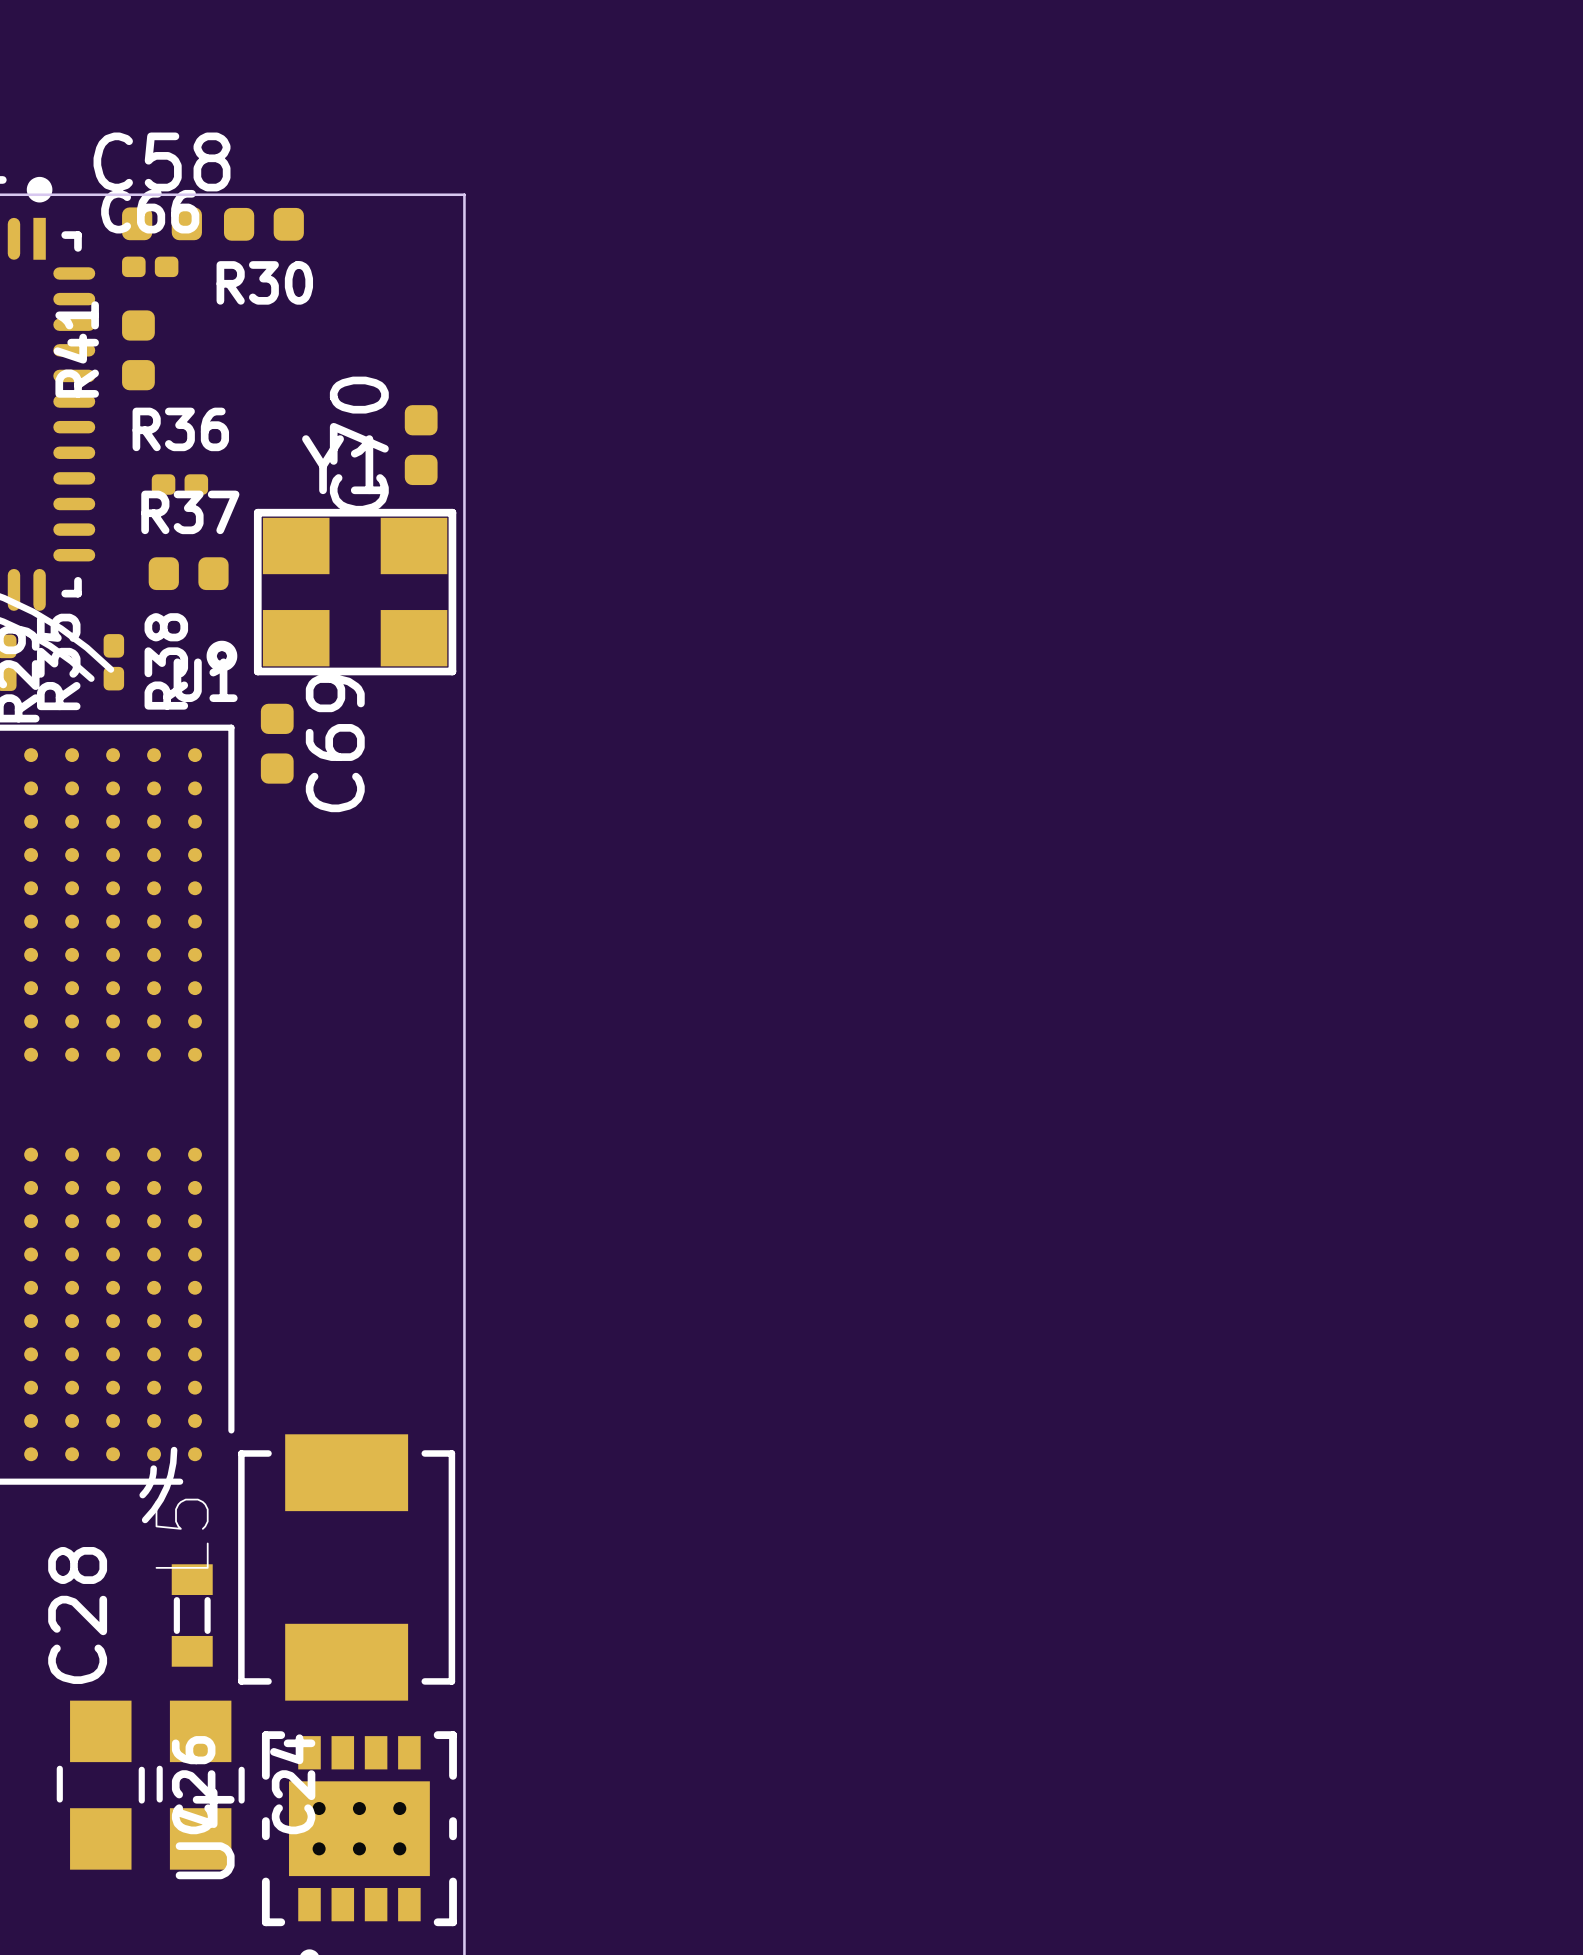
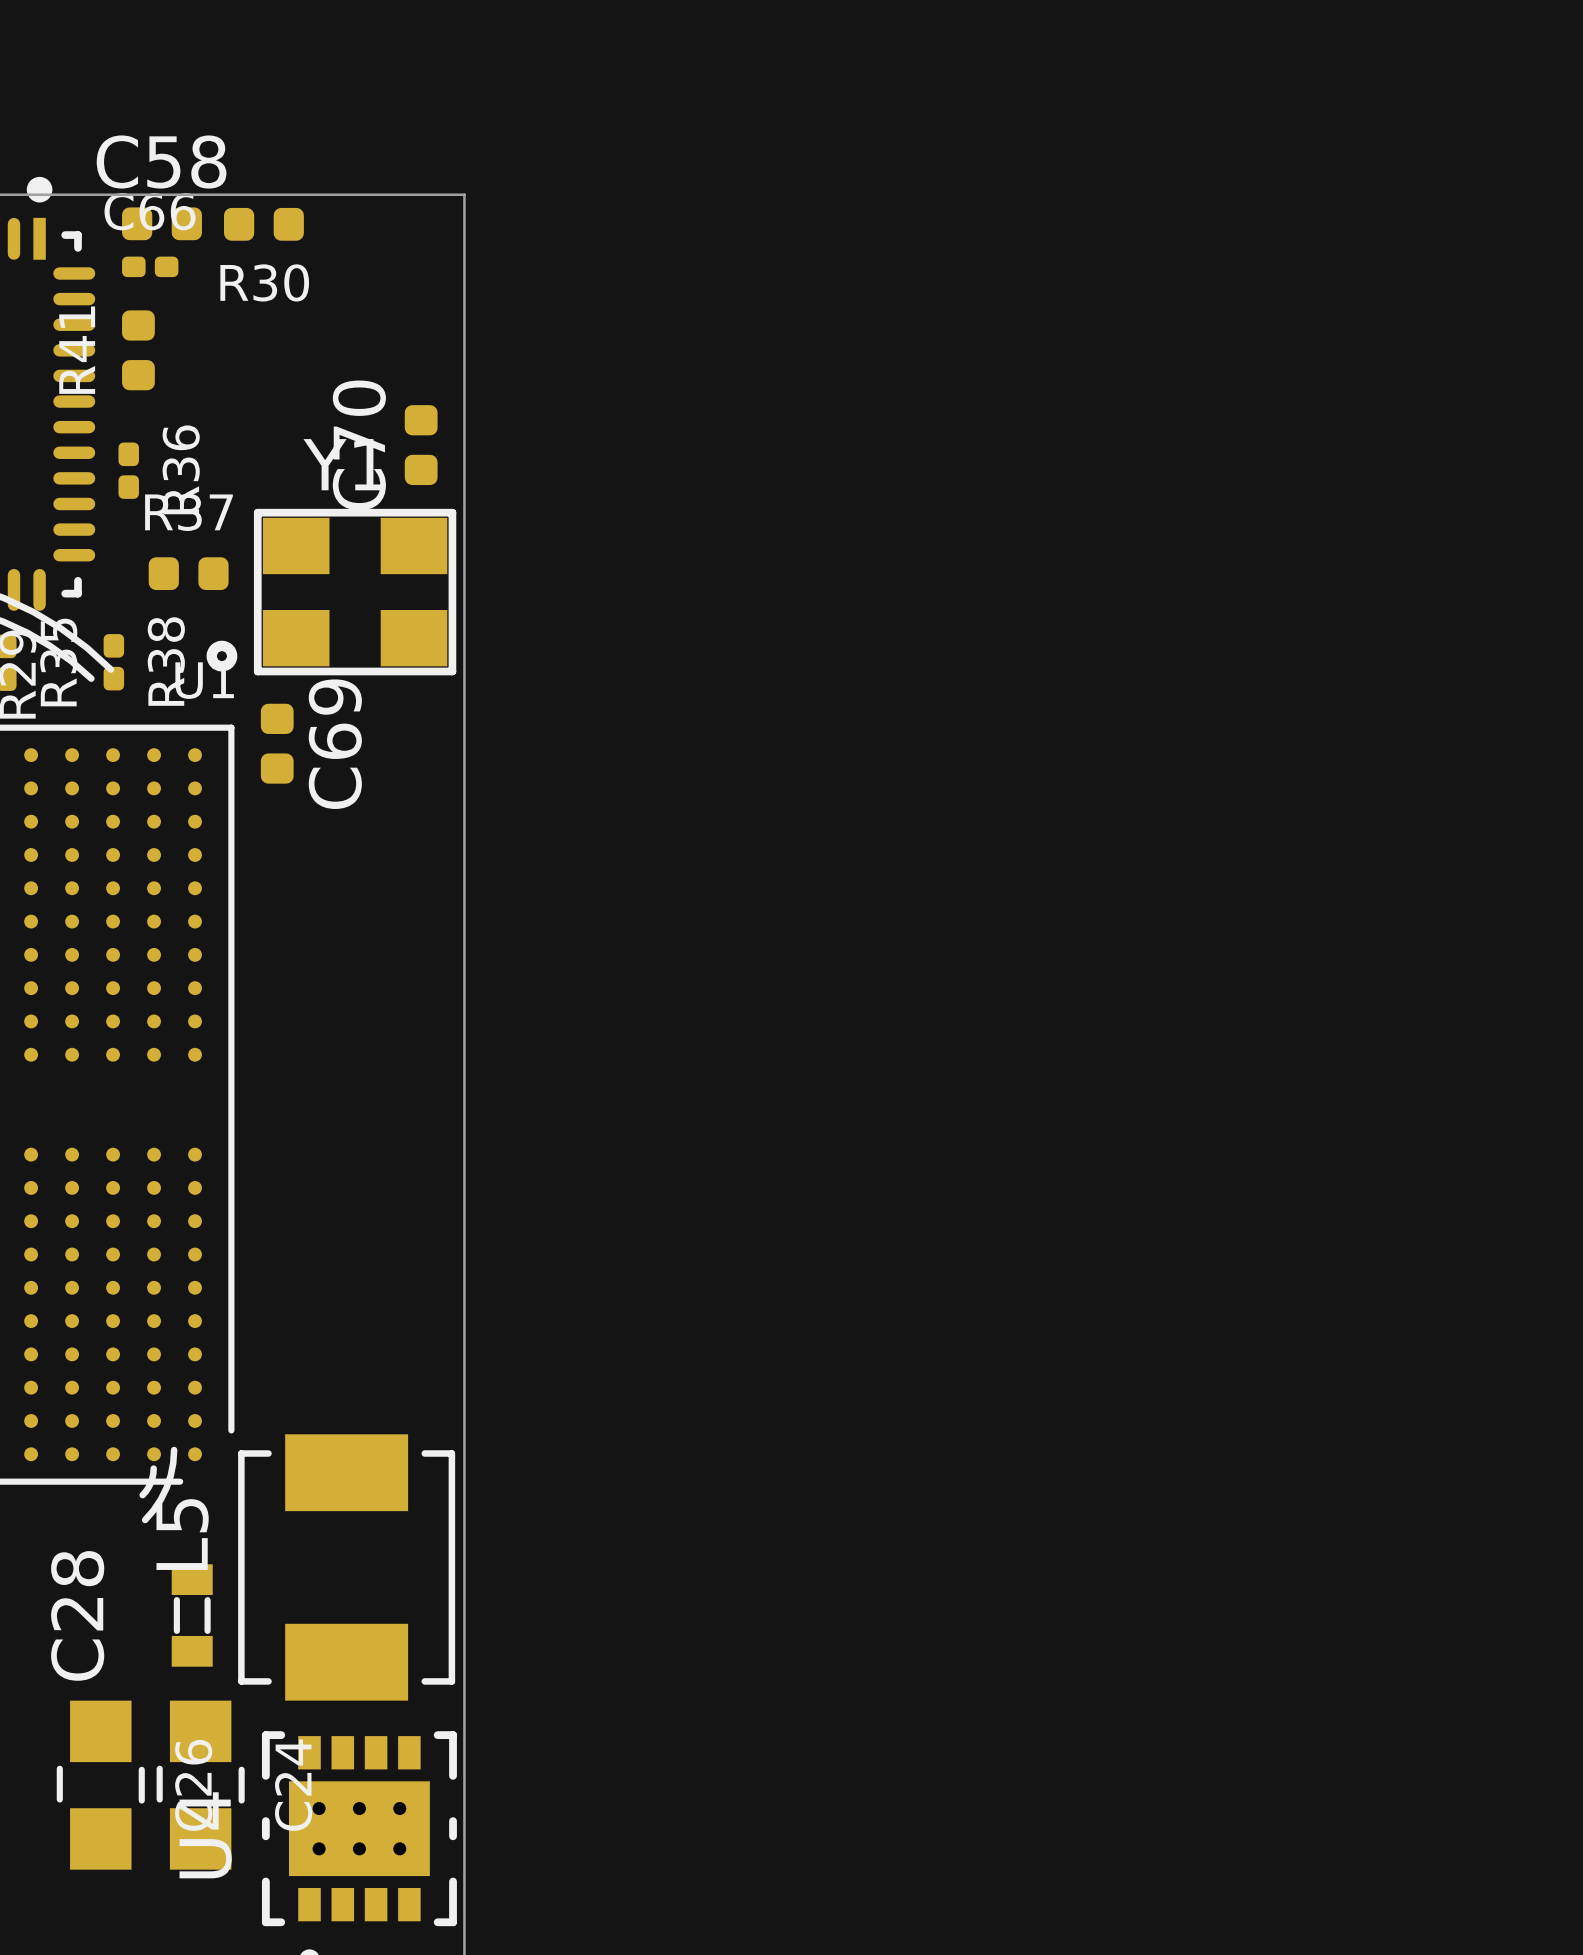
R36 rotation: 0° (179, 484) -> 90° clockwise (128, 470)
R36 position: (179, 484) -> (128, 470)

